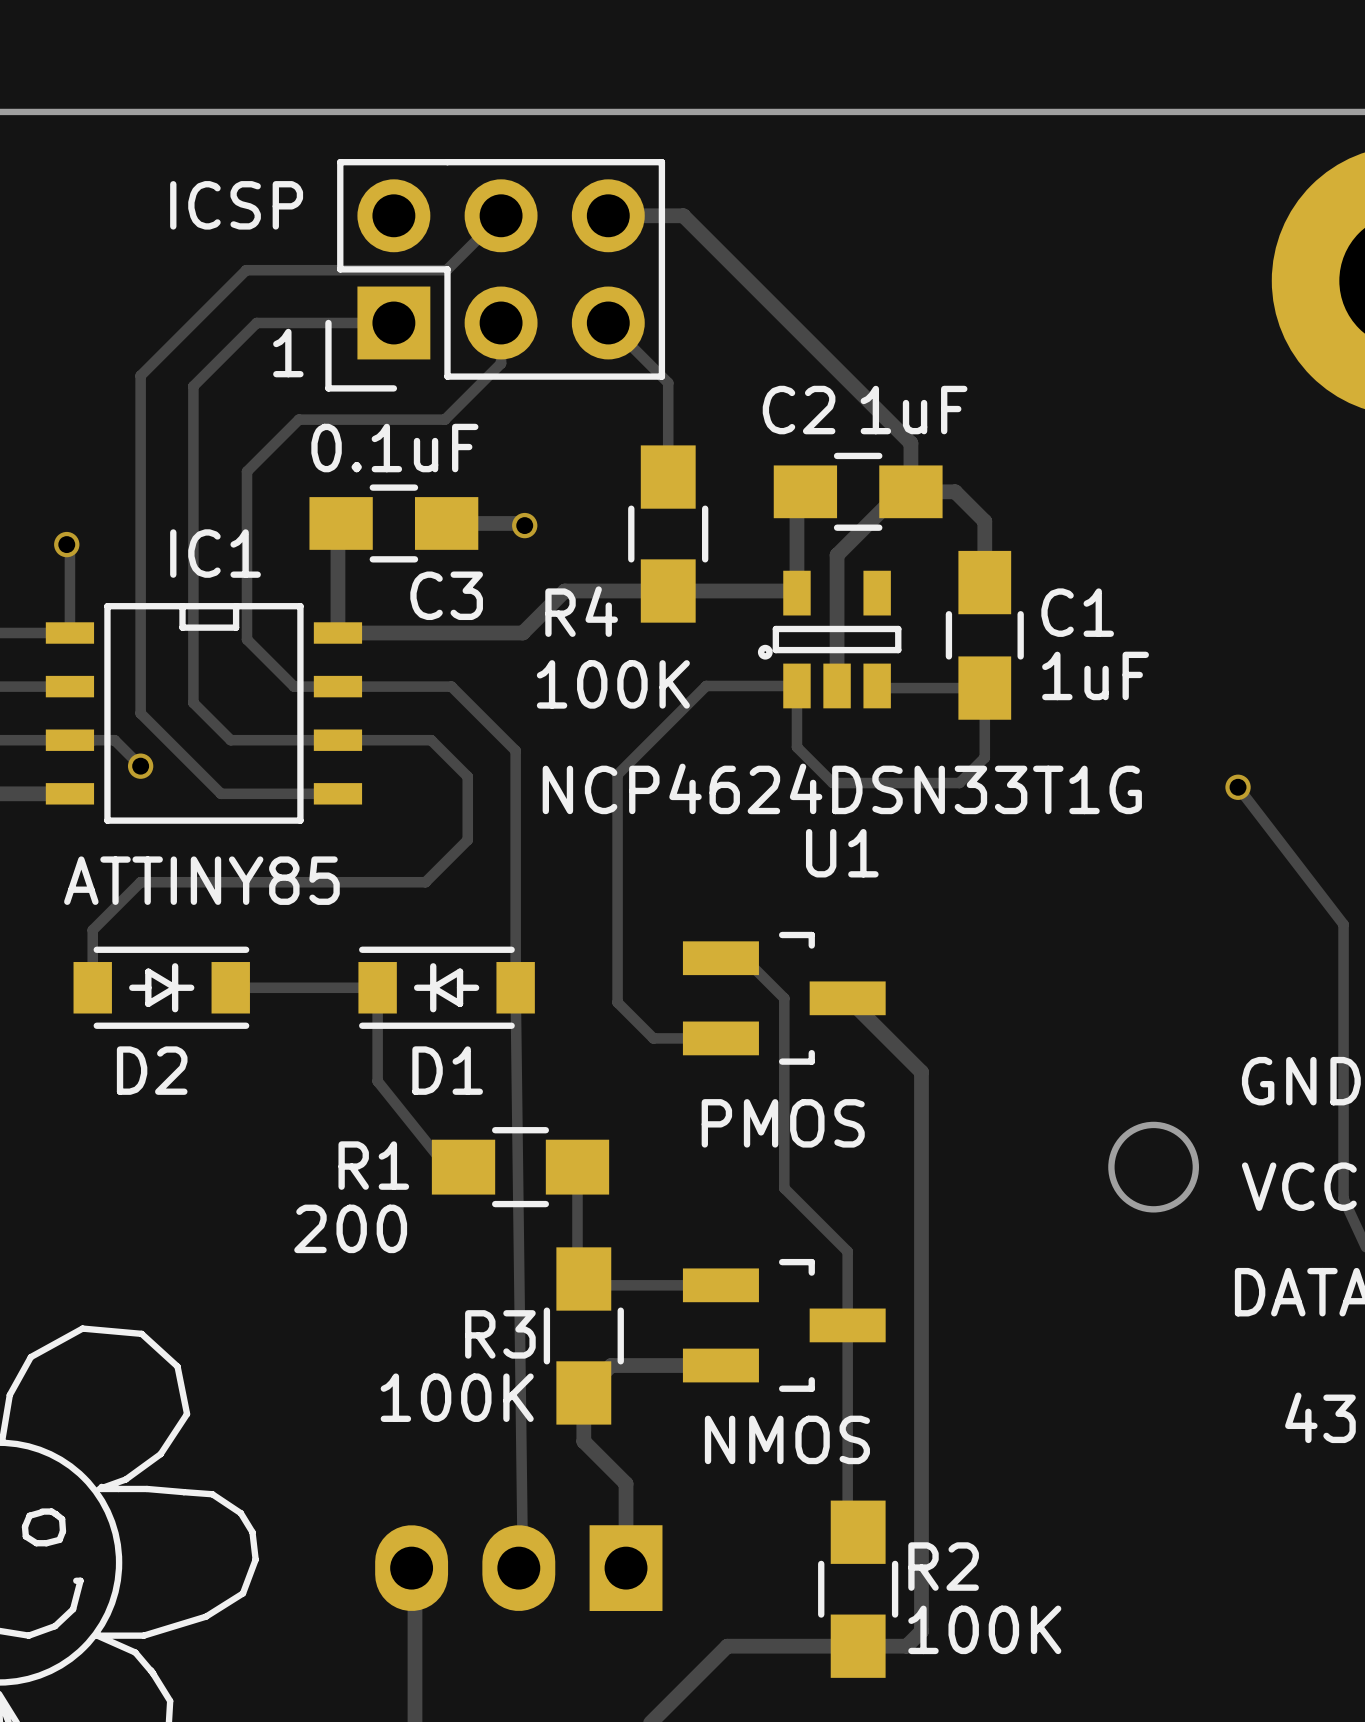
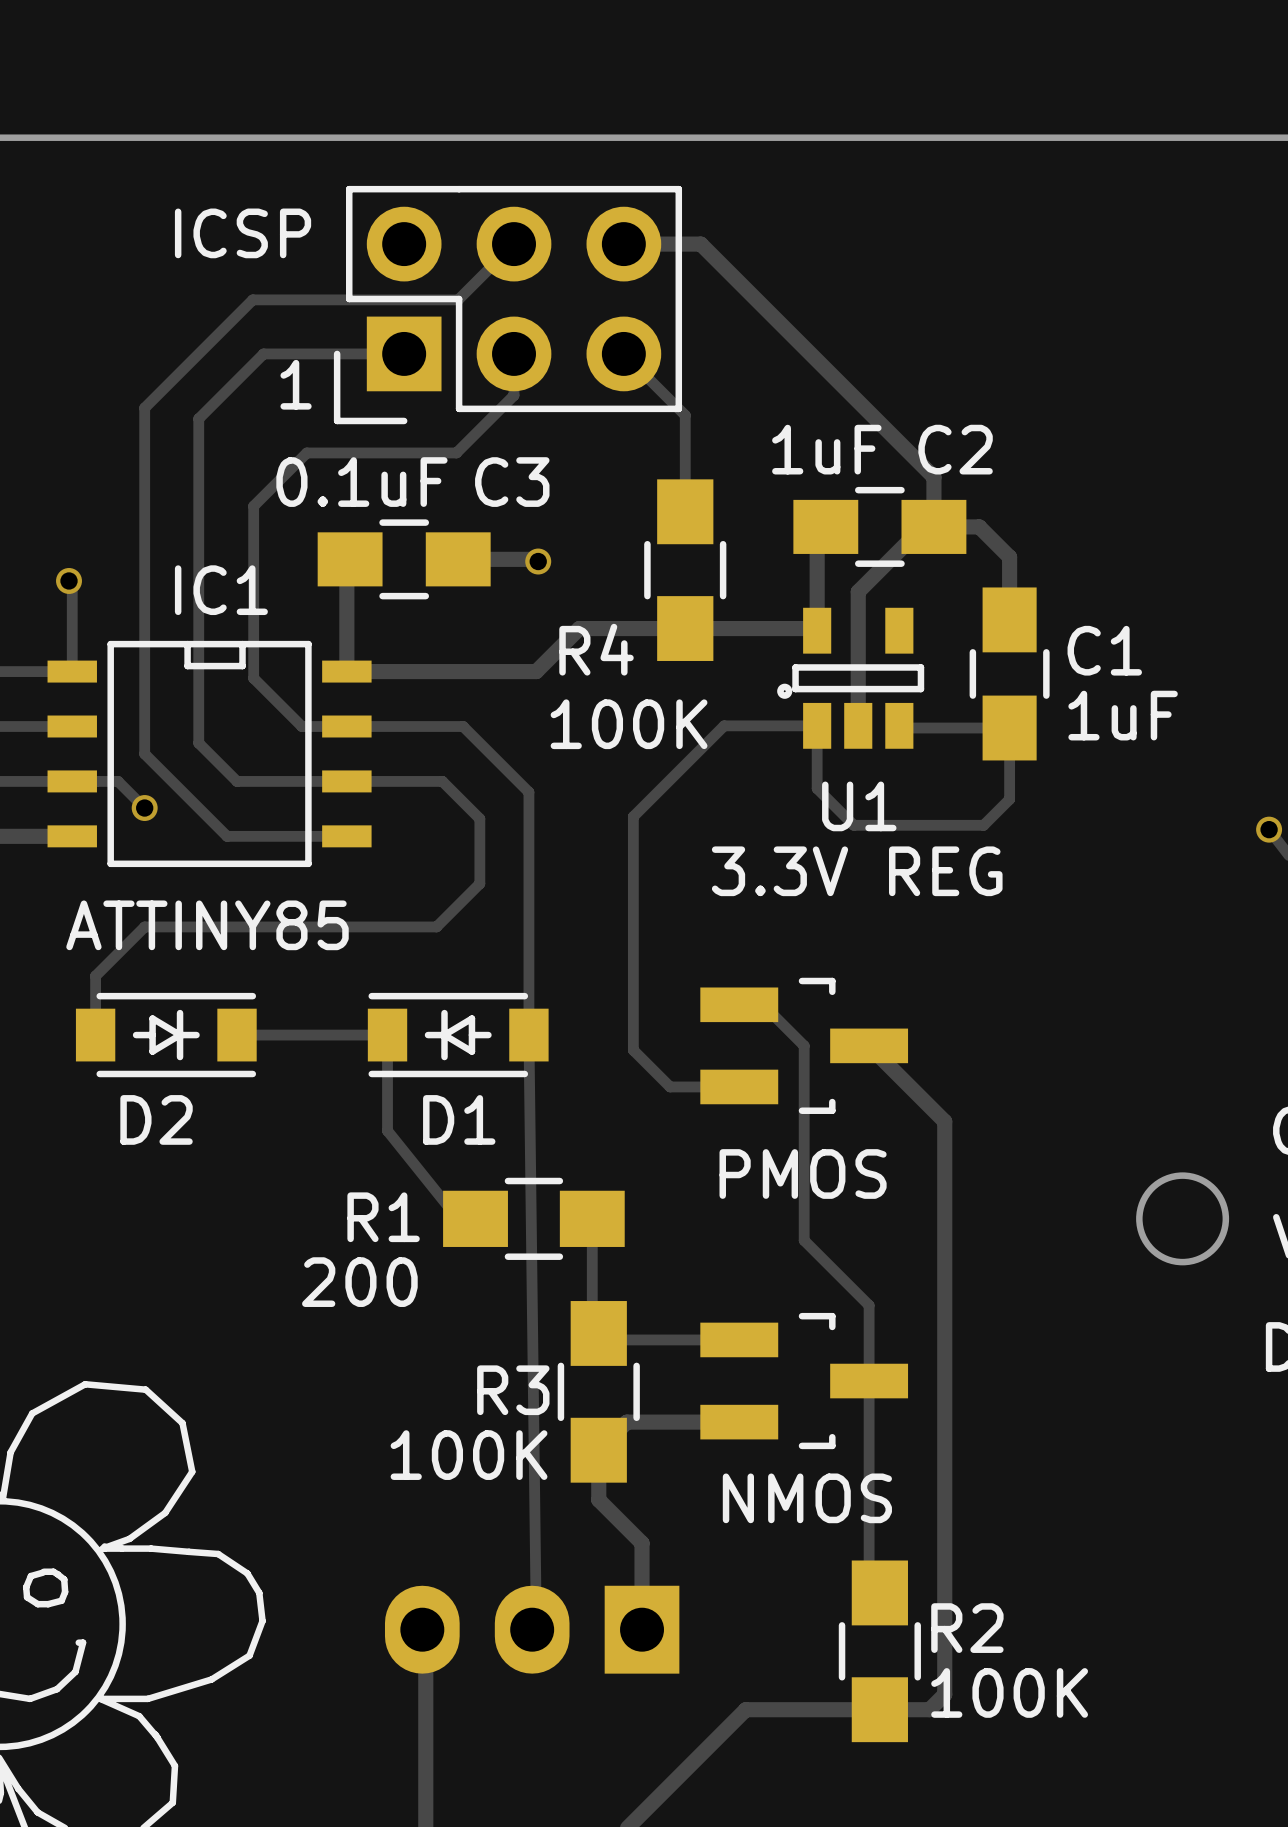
C2 name position: C2 (799, 410) -> C2 (955, 449)
C2 value position: 1uF (914, 410) -> 1uF (826, 449)
C3 value position: 0.1uF (394, 448) -> 0.1uF (361, 482)
C3 name position: C3 (446, 595) -> C3 (512, 482)
U1 value: NCP4624DSN33T1G (842, 788) -> 3.3V REG (857, 871)
U1 name position: U1 (842, 853) -> U1 (859, 806)

